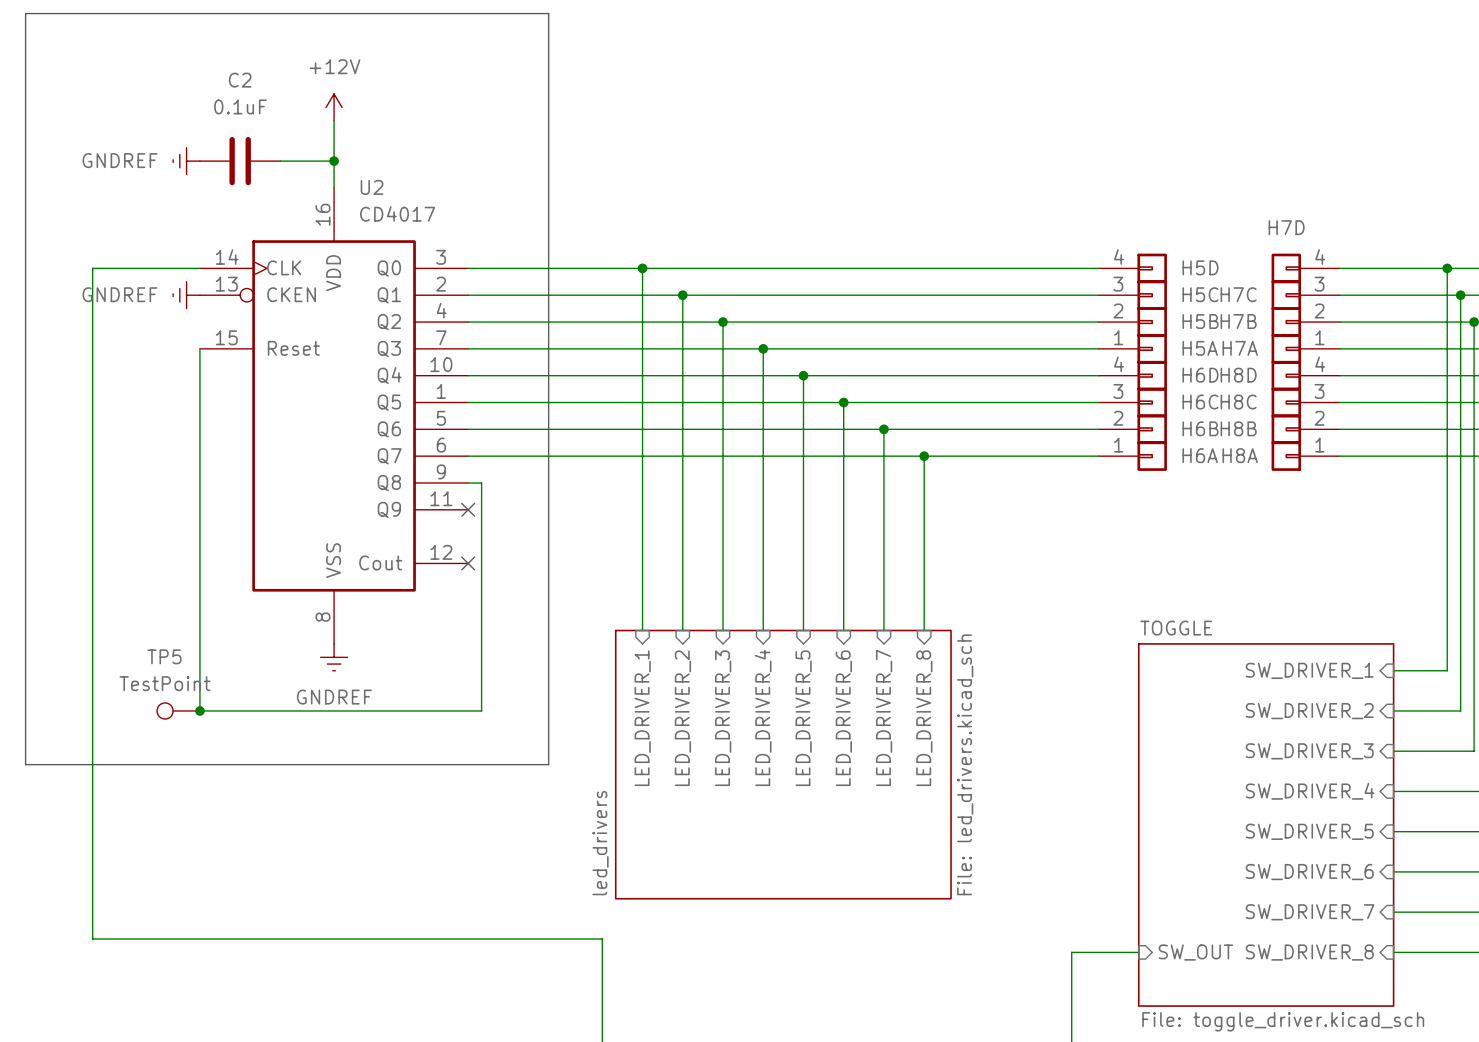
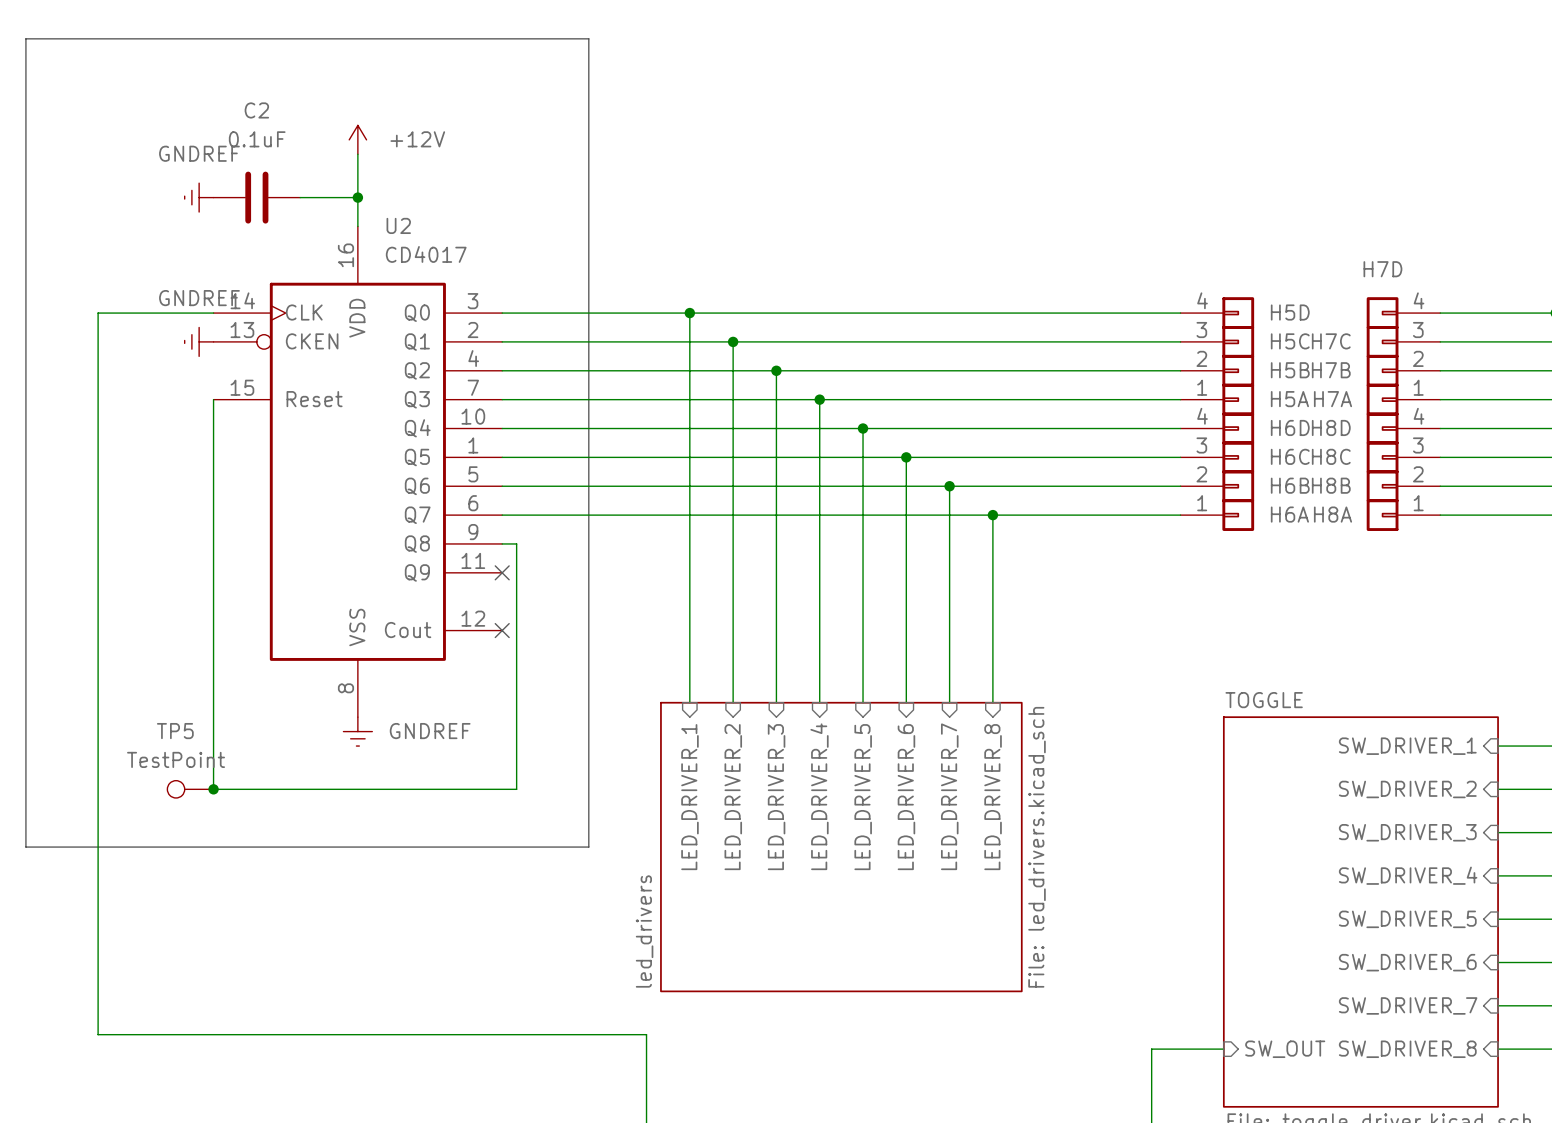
power symbol text position: +12V (335, 66) -> +12V (417, 139)
power symbol text position: GNDREF (120, 160) -> GNDREF (199, 153)
power symbol text position: GNDREF (120, 294) -> GNDREF (199, 298)
power symbol text position: GNDREF (334, 697) -> GNDREF (430, 731)

